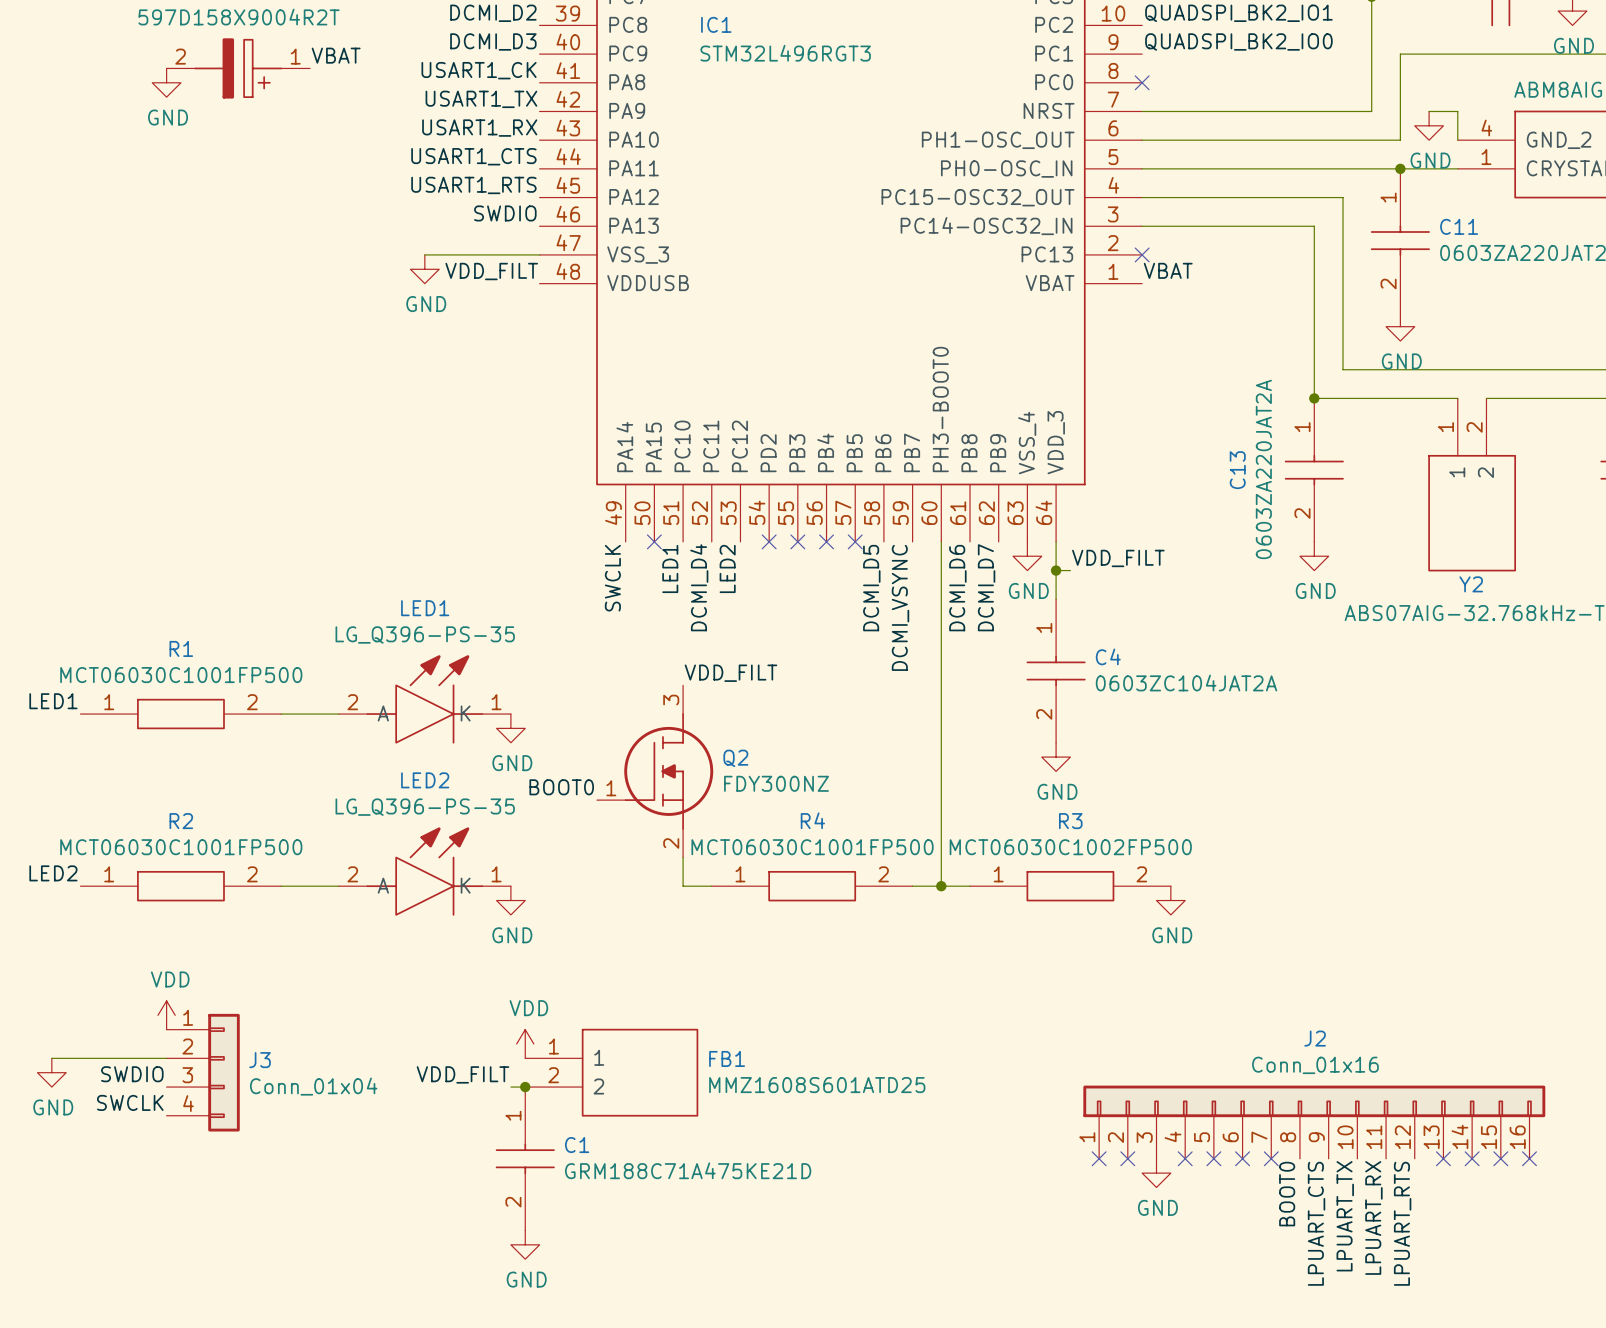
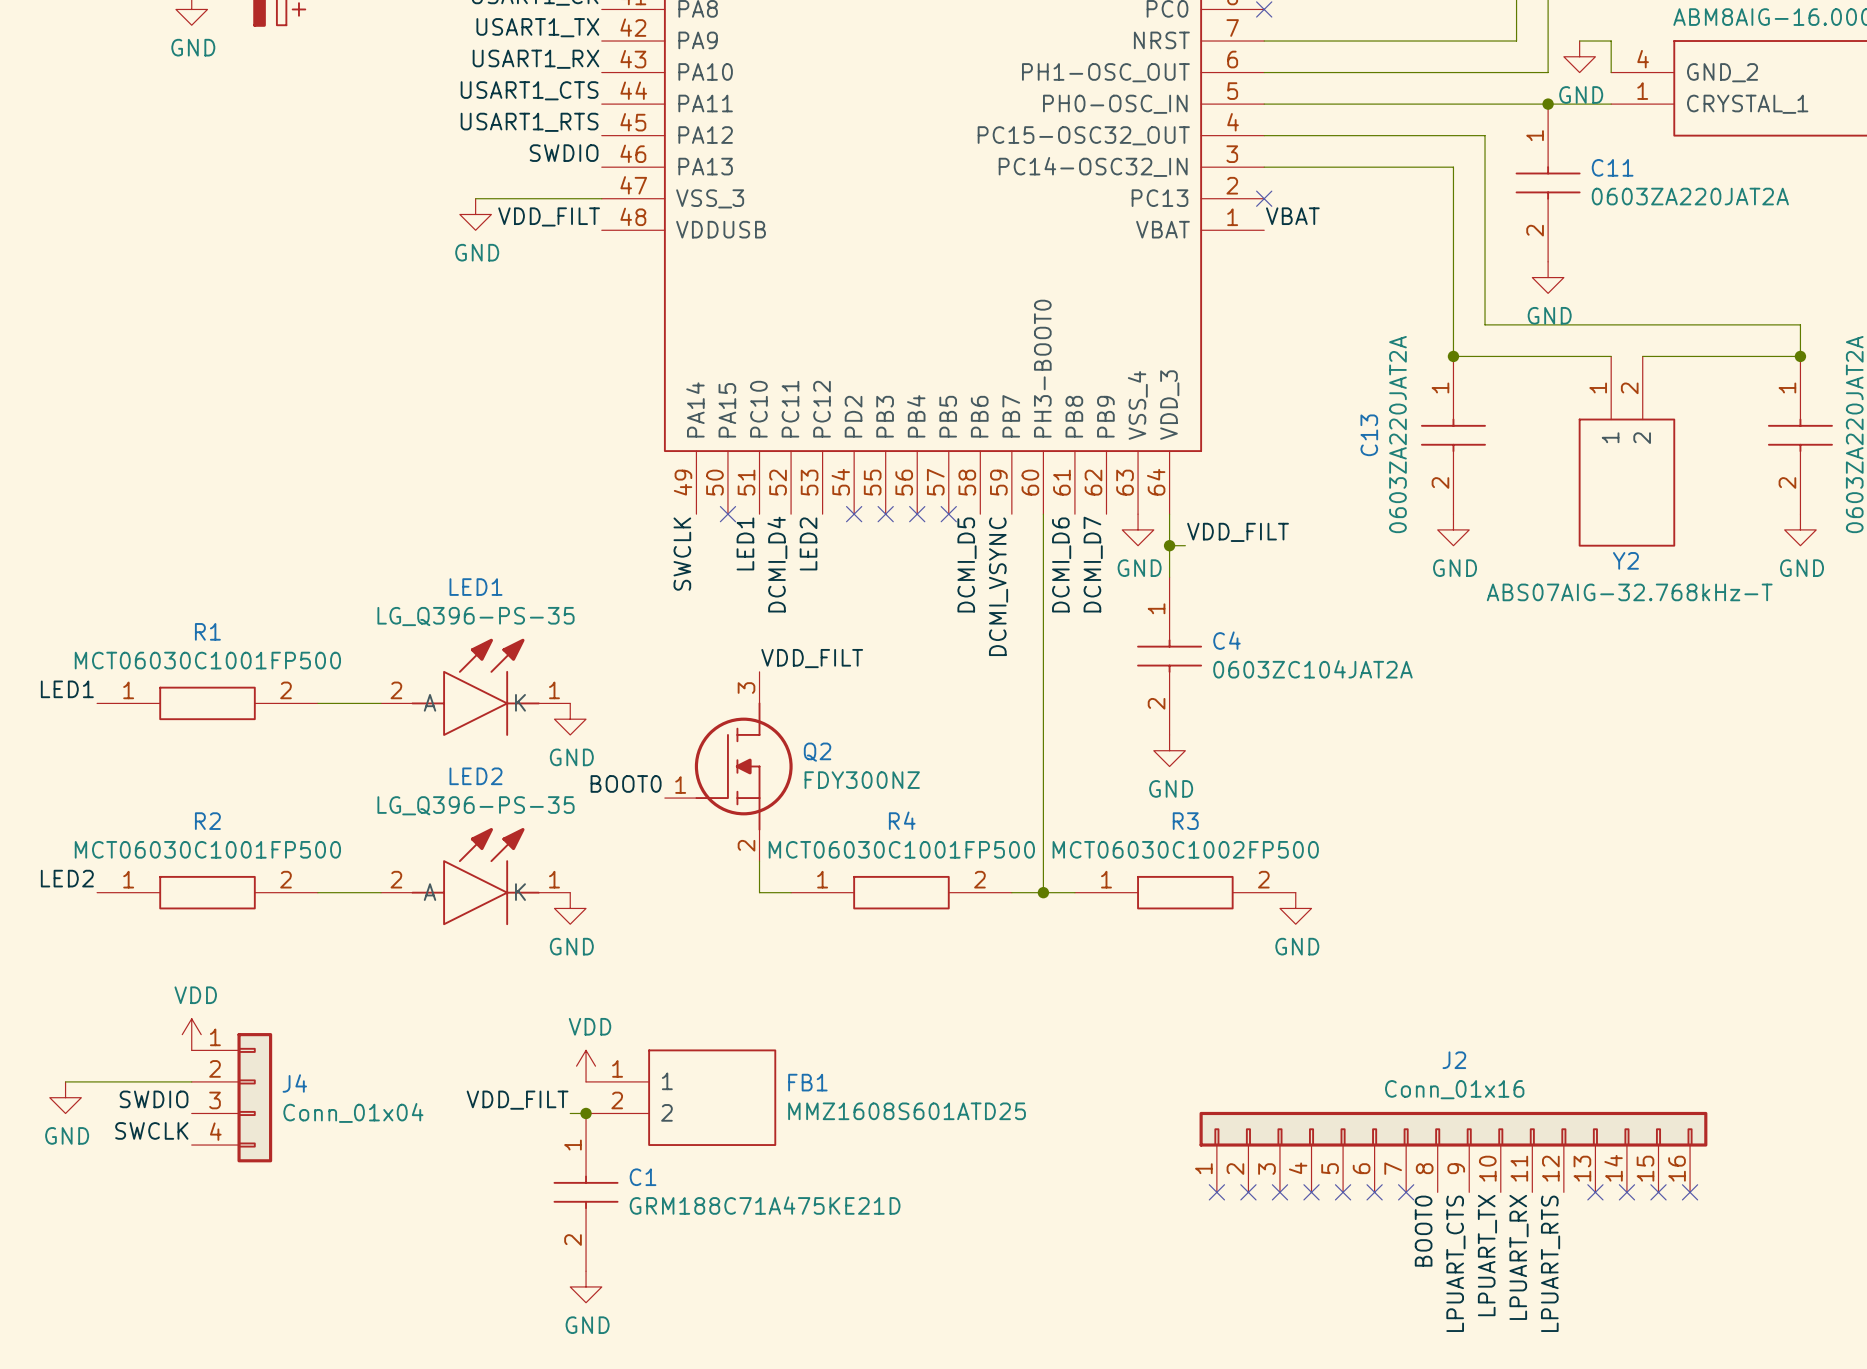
J3 name: J3 (260, 1060) -> J4 (294, 1083)
no-connect mark: none -> (1279, 1192)
power symbol: GND (1156, 1173) -> none

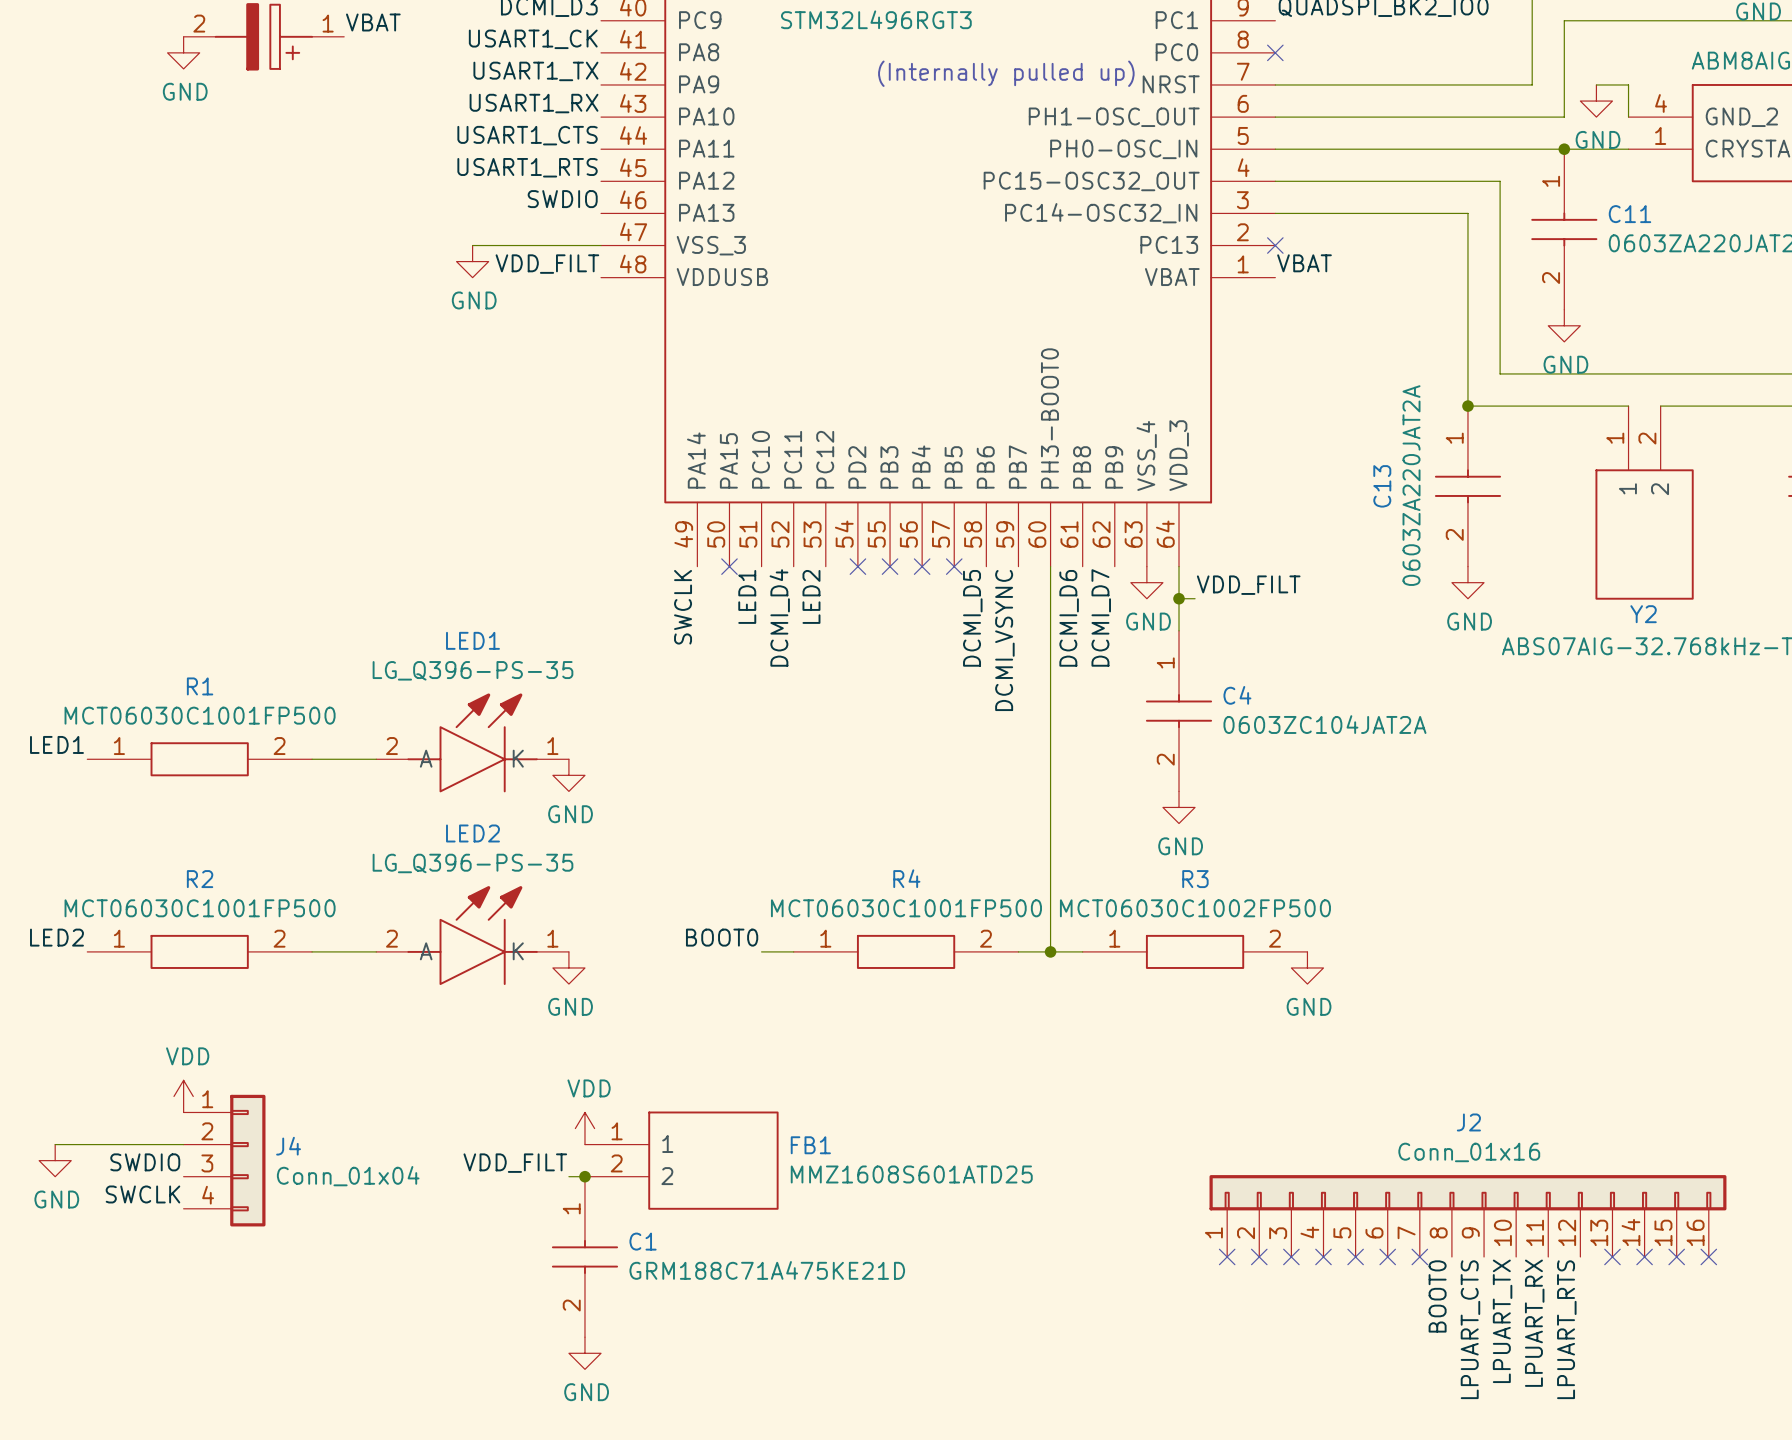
text: none -> (Internally pulled up) (1006, 73)
label: VDD_FILT (812, 658) -> none
Q2: FDY300NZ (728, 766) -> none
label position: BOOT0 (626, 783) -> BOOT0 (722, 937)
wire: (759, 861) (759, 892) -> none

